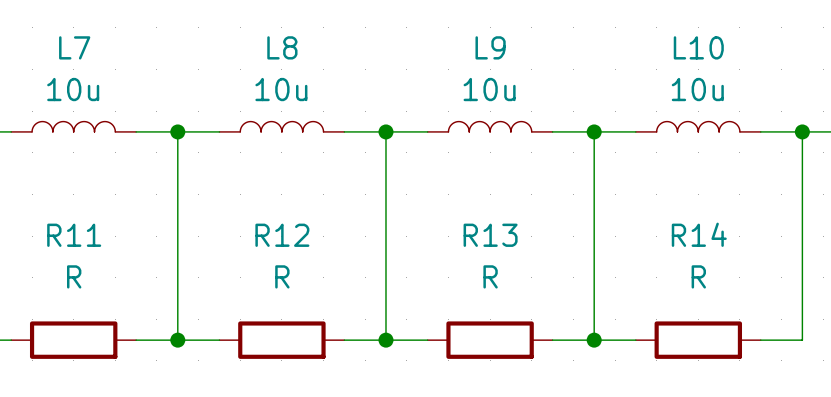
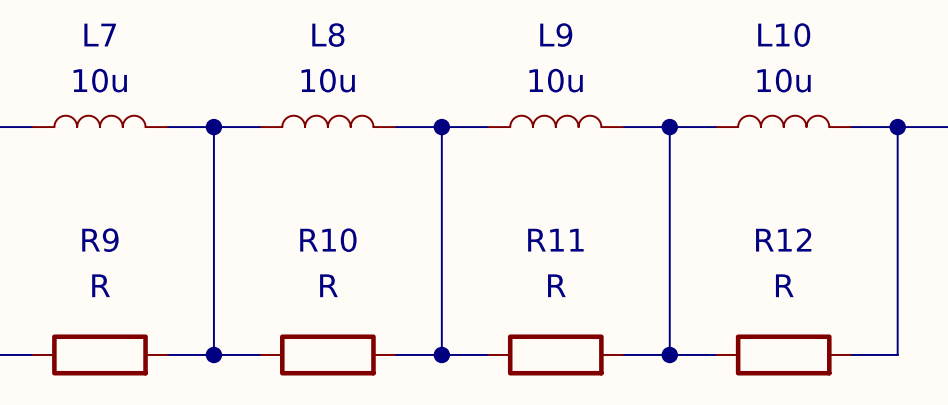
R14 name: R14 (699, 234) -> R12 (783, 239)
R11 name: R11 (74, 235) -> R9 (100, 240)
R12 name: R12 (282, 235) -> R10 (328, 240)
R13 name: R13 (490, 235) -> R11 (555, 240)

